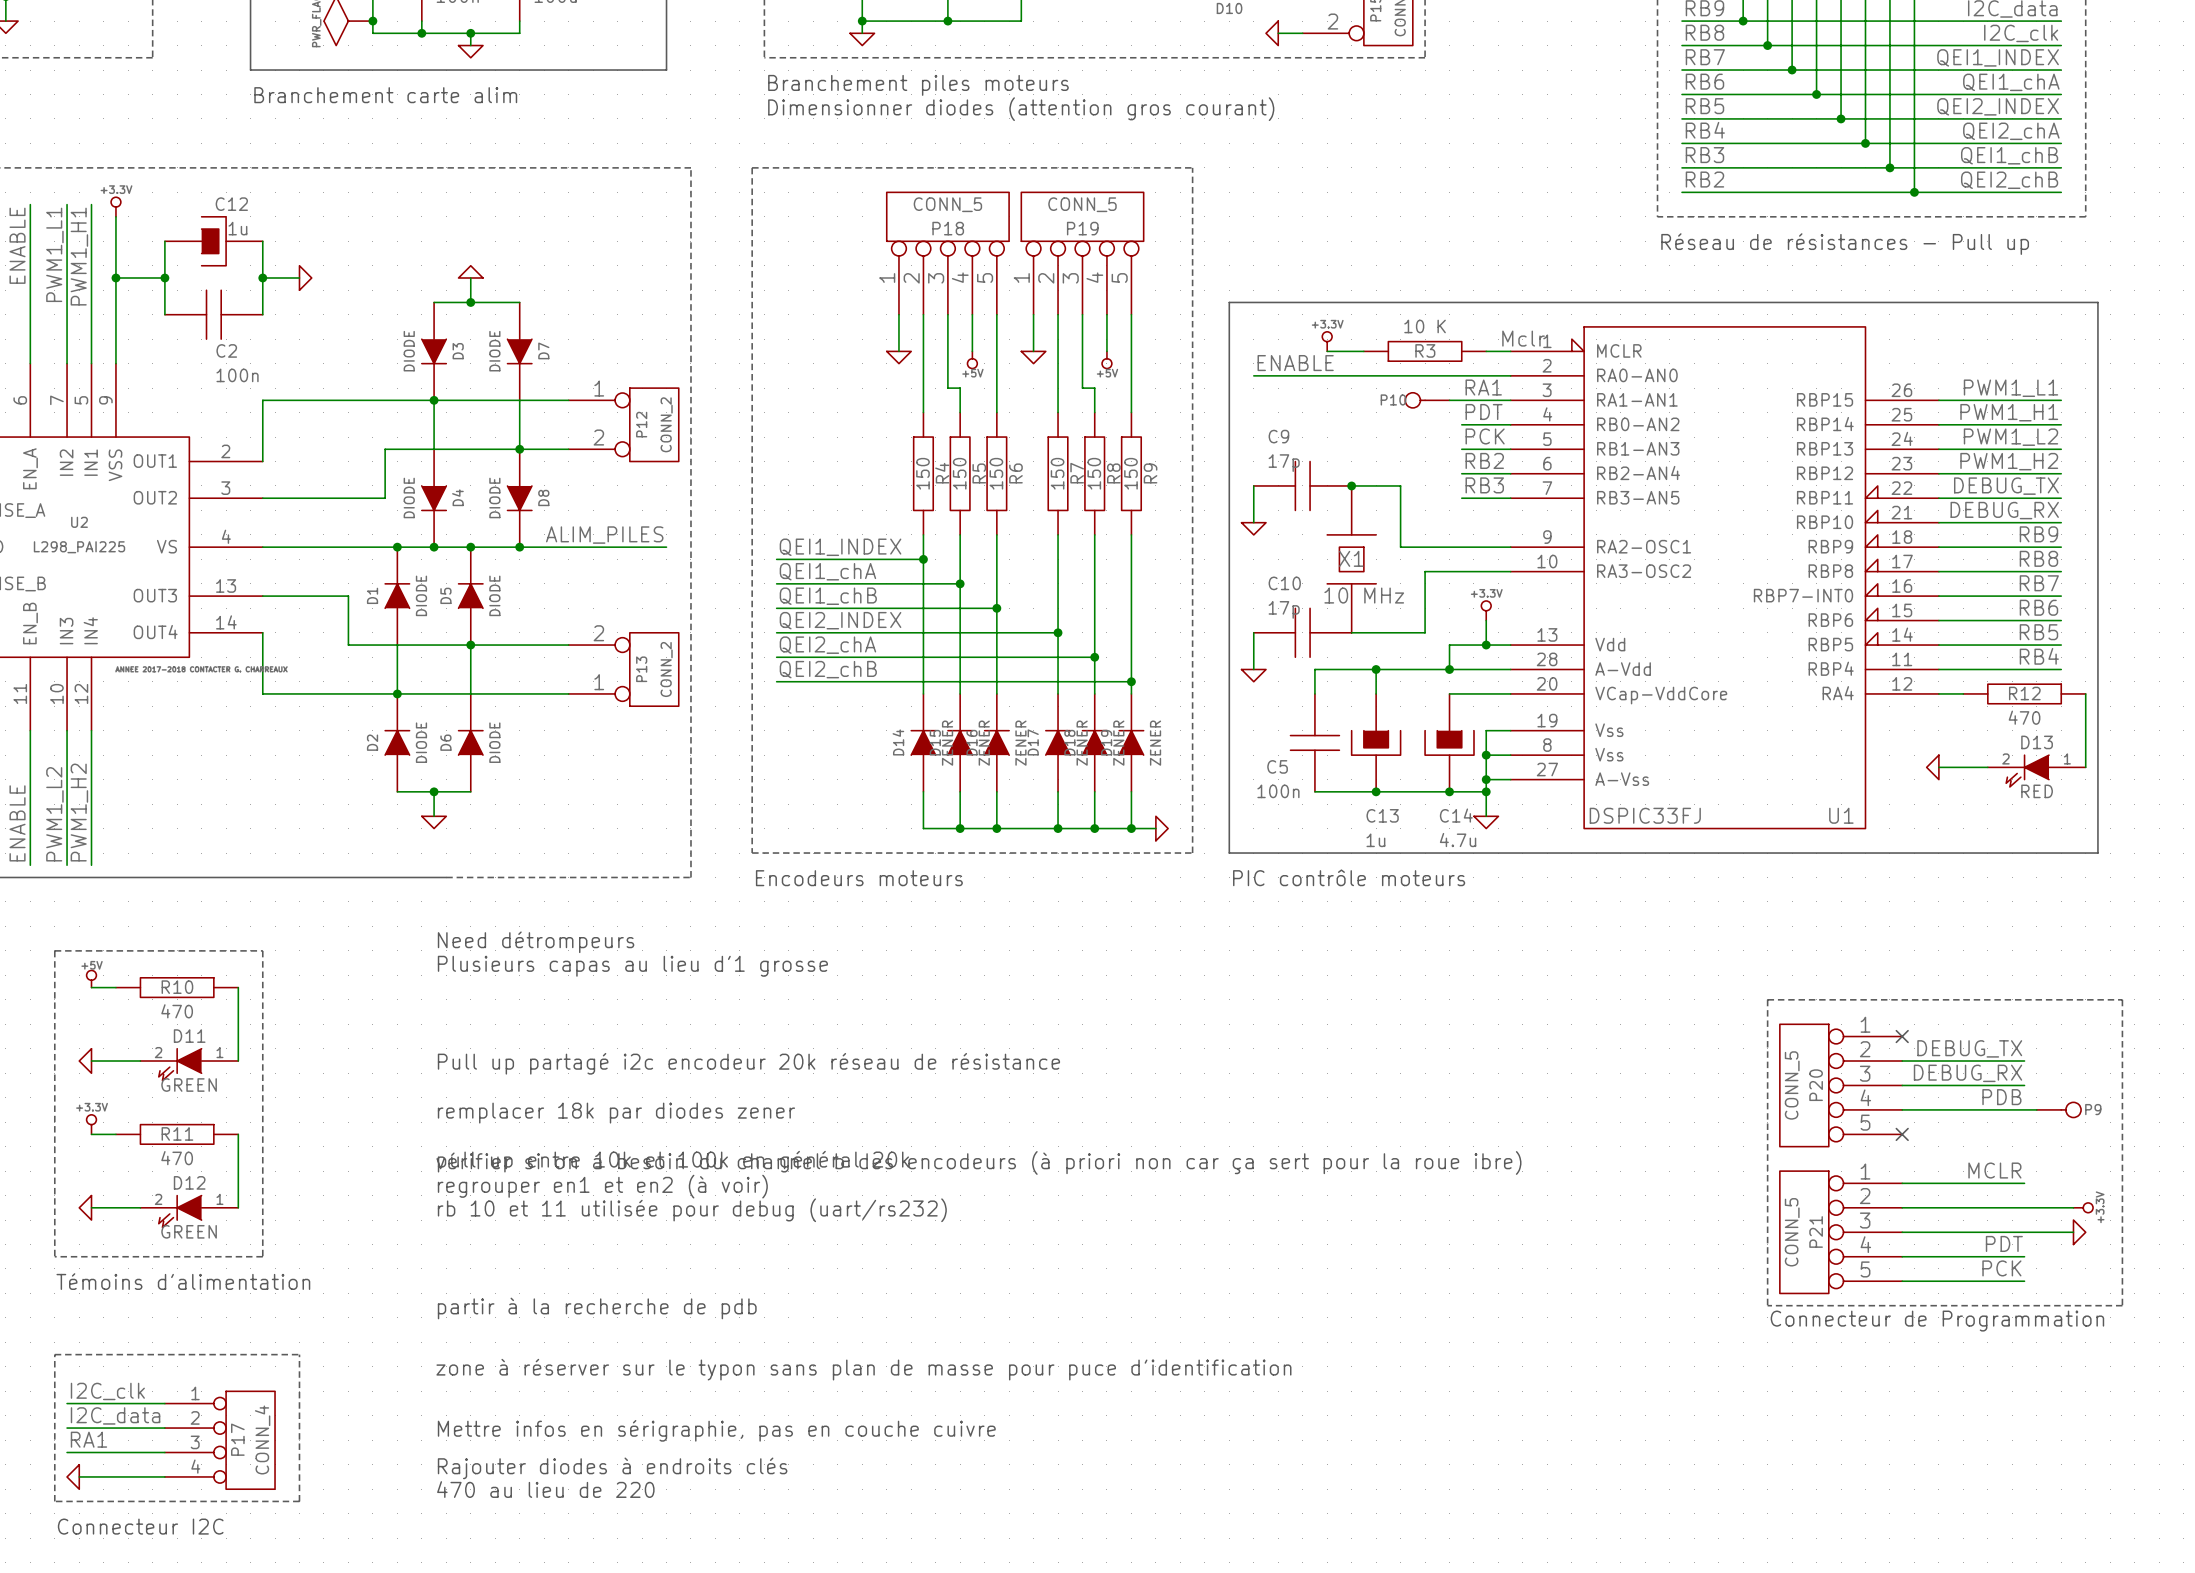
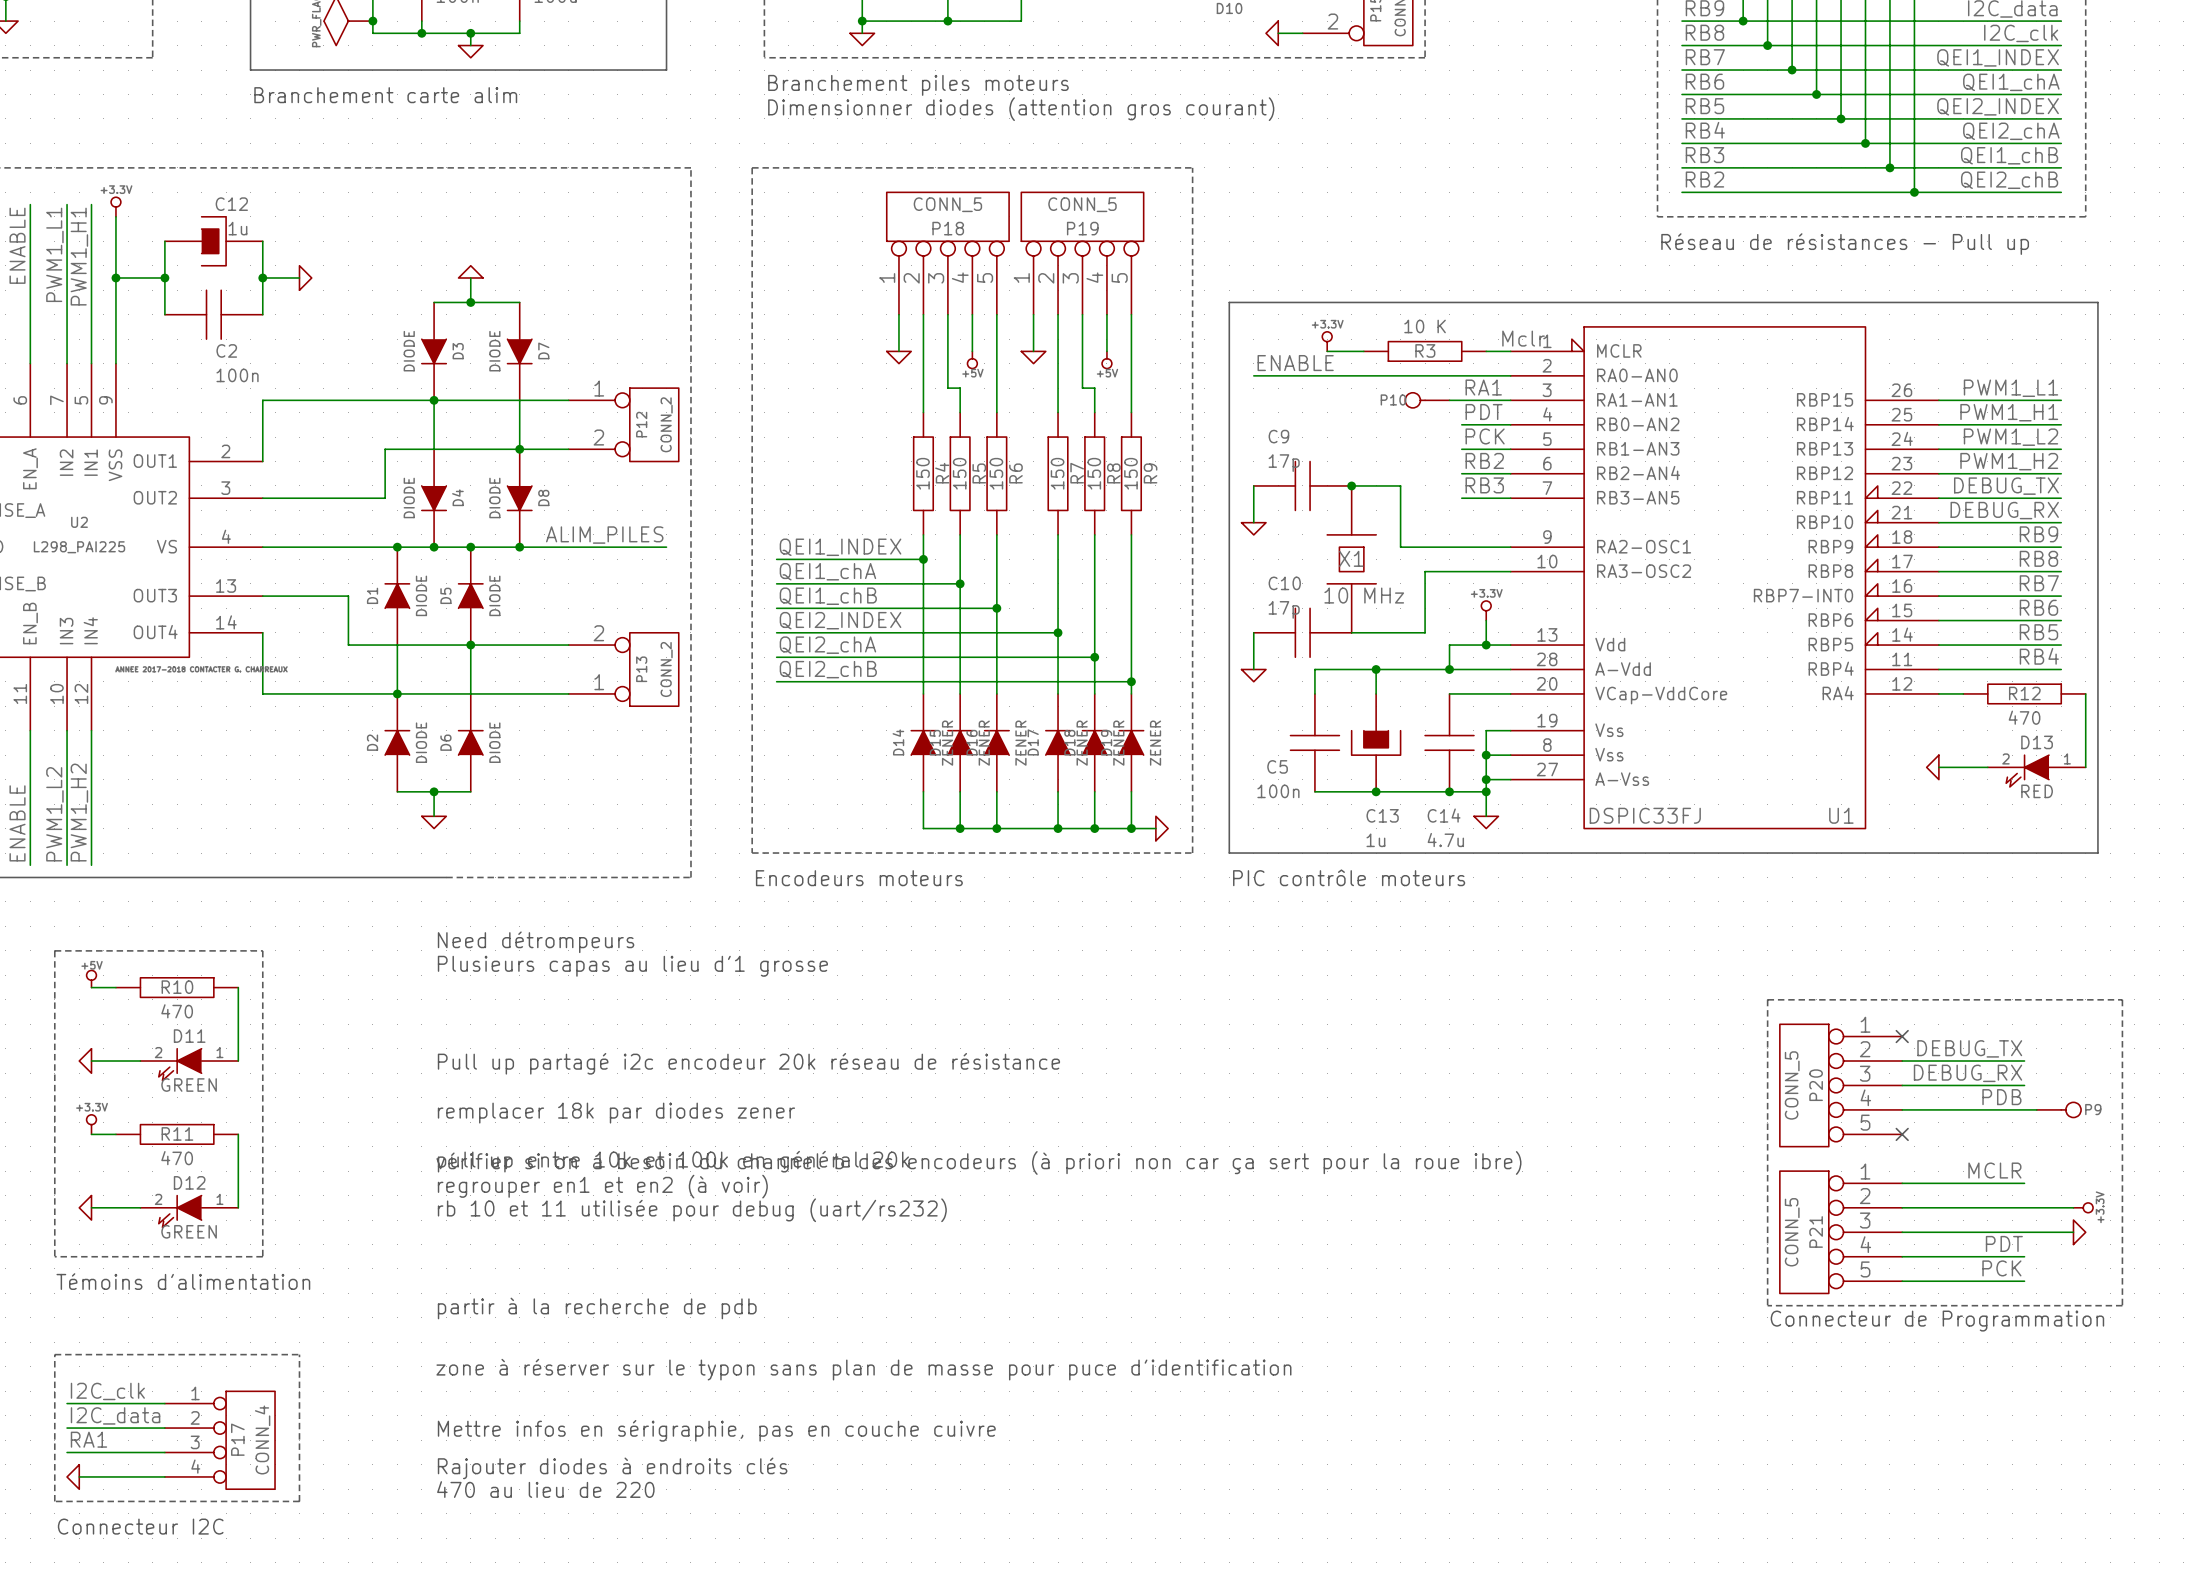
C14 symbol: [1425, 693, 1474, 792] -> [1425, 693, 1474, 792]
C14 name position: C14 (1456, 815) -> C14 (1444, 815)
C14 value position: 4.7u (1458, 840) -> 4.7u (1445, 840)

